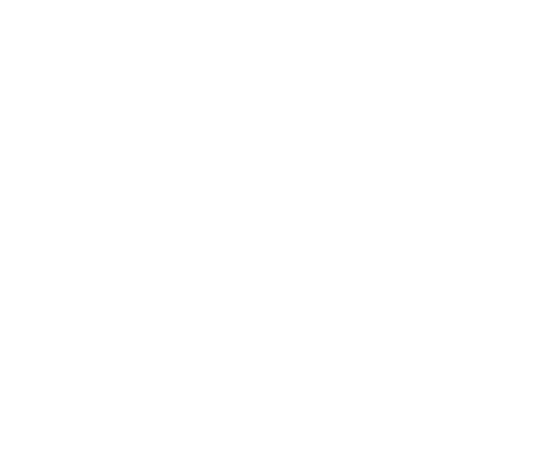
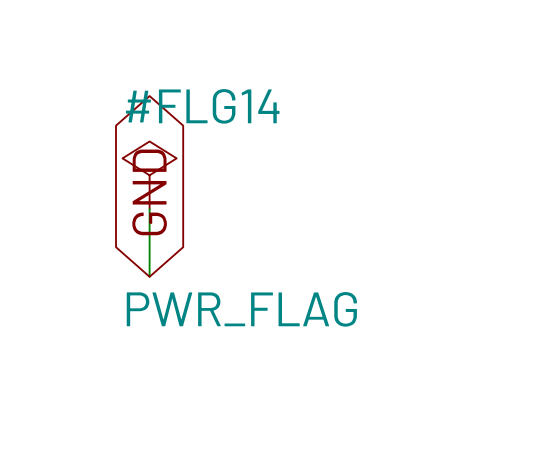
#FLG14: none -> PWR_FLAG (149, 175)
global label: none -> GND (149, 192)
wire: none -> (149, 209) (149, 276)

